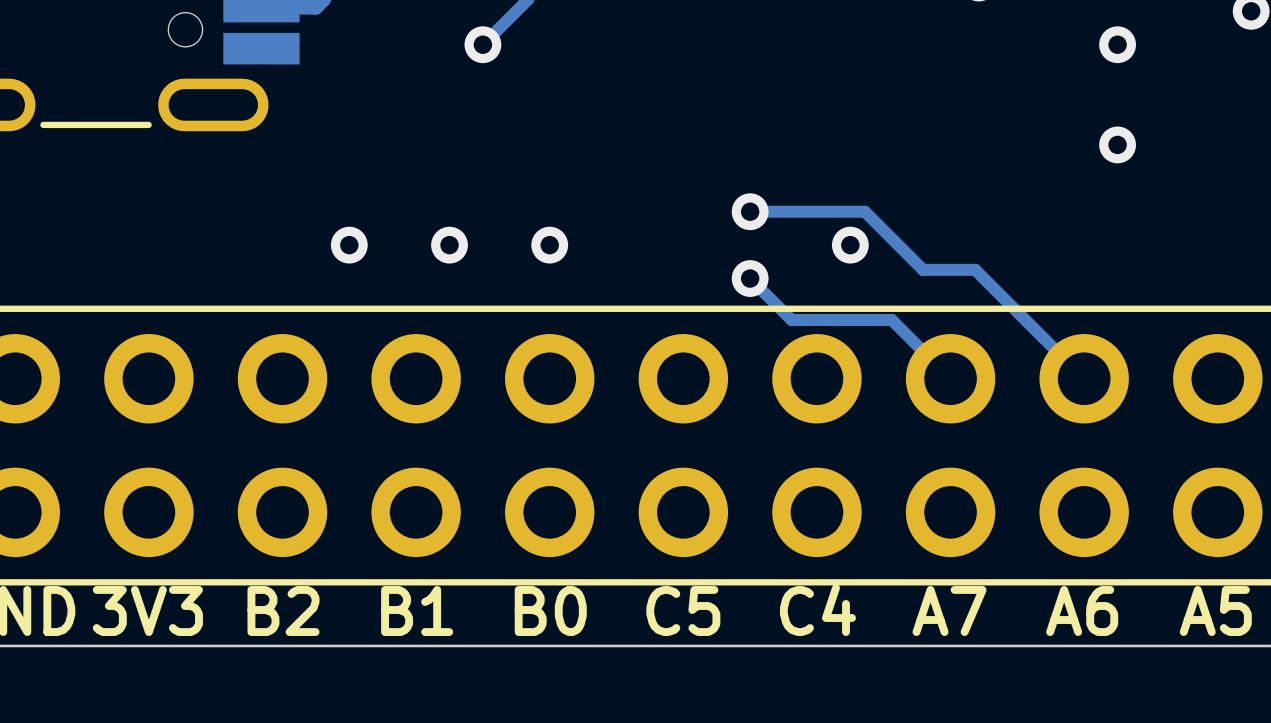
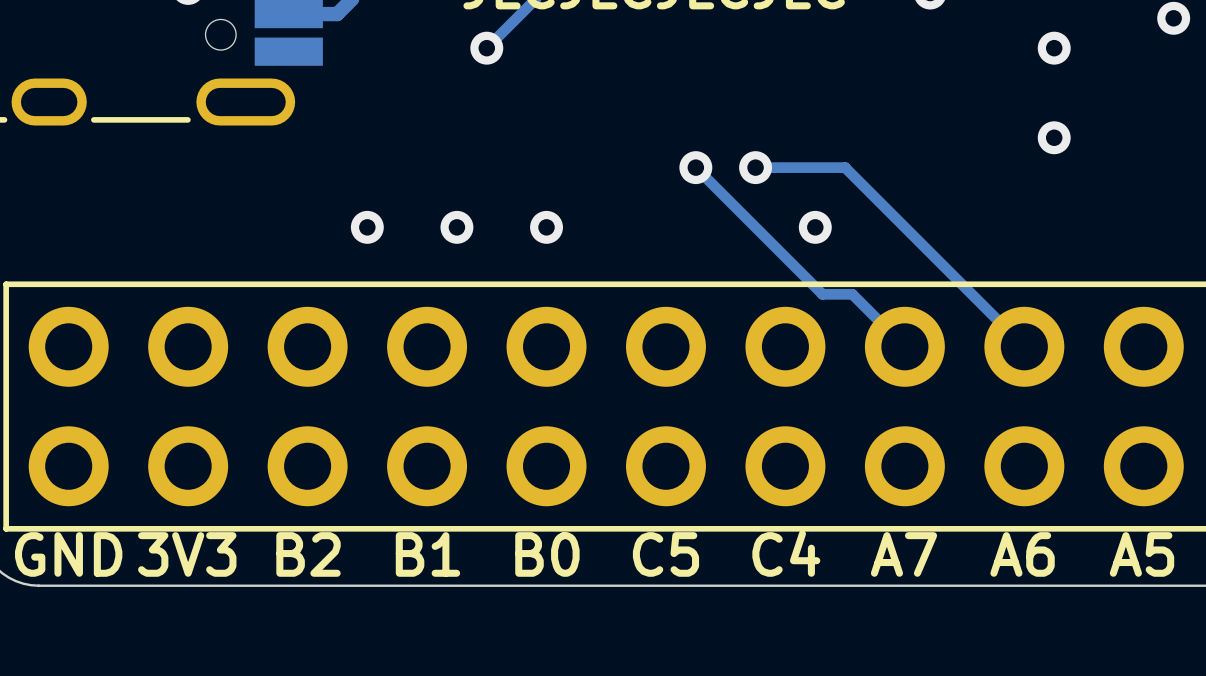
via: none -> (695, 167)
via: none -> (755, 167)
track: (750, 211) (864, 211) (923, 269) (975, 269) -> (755, 167) (845, 167) (927, 249)
via: (750, 211) -> none
track: (750, 278) (791, 320) (858, 320) -> (695, 167) (822, 294)
via: (750, 278) -> none

